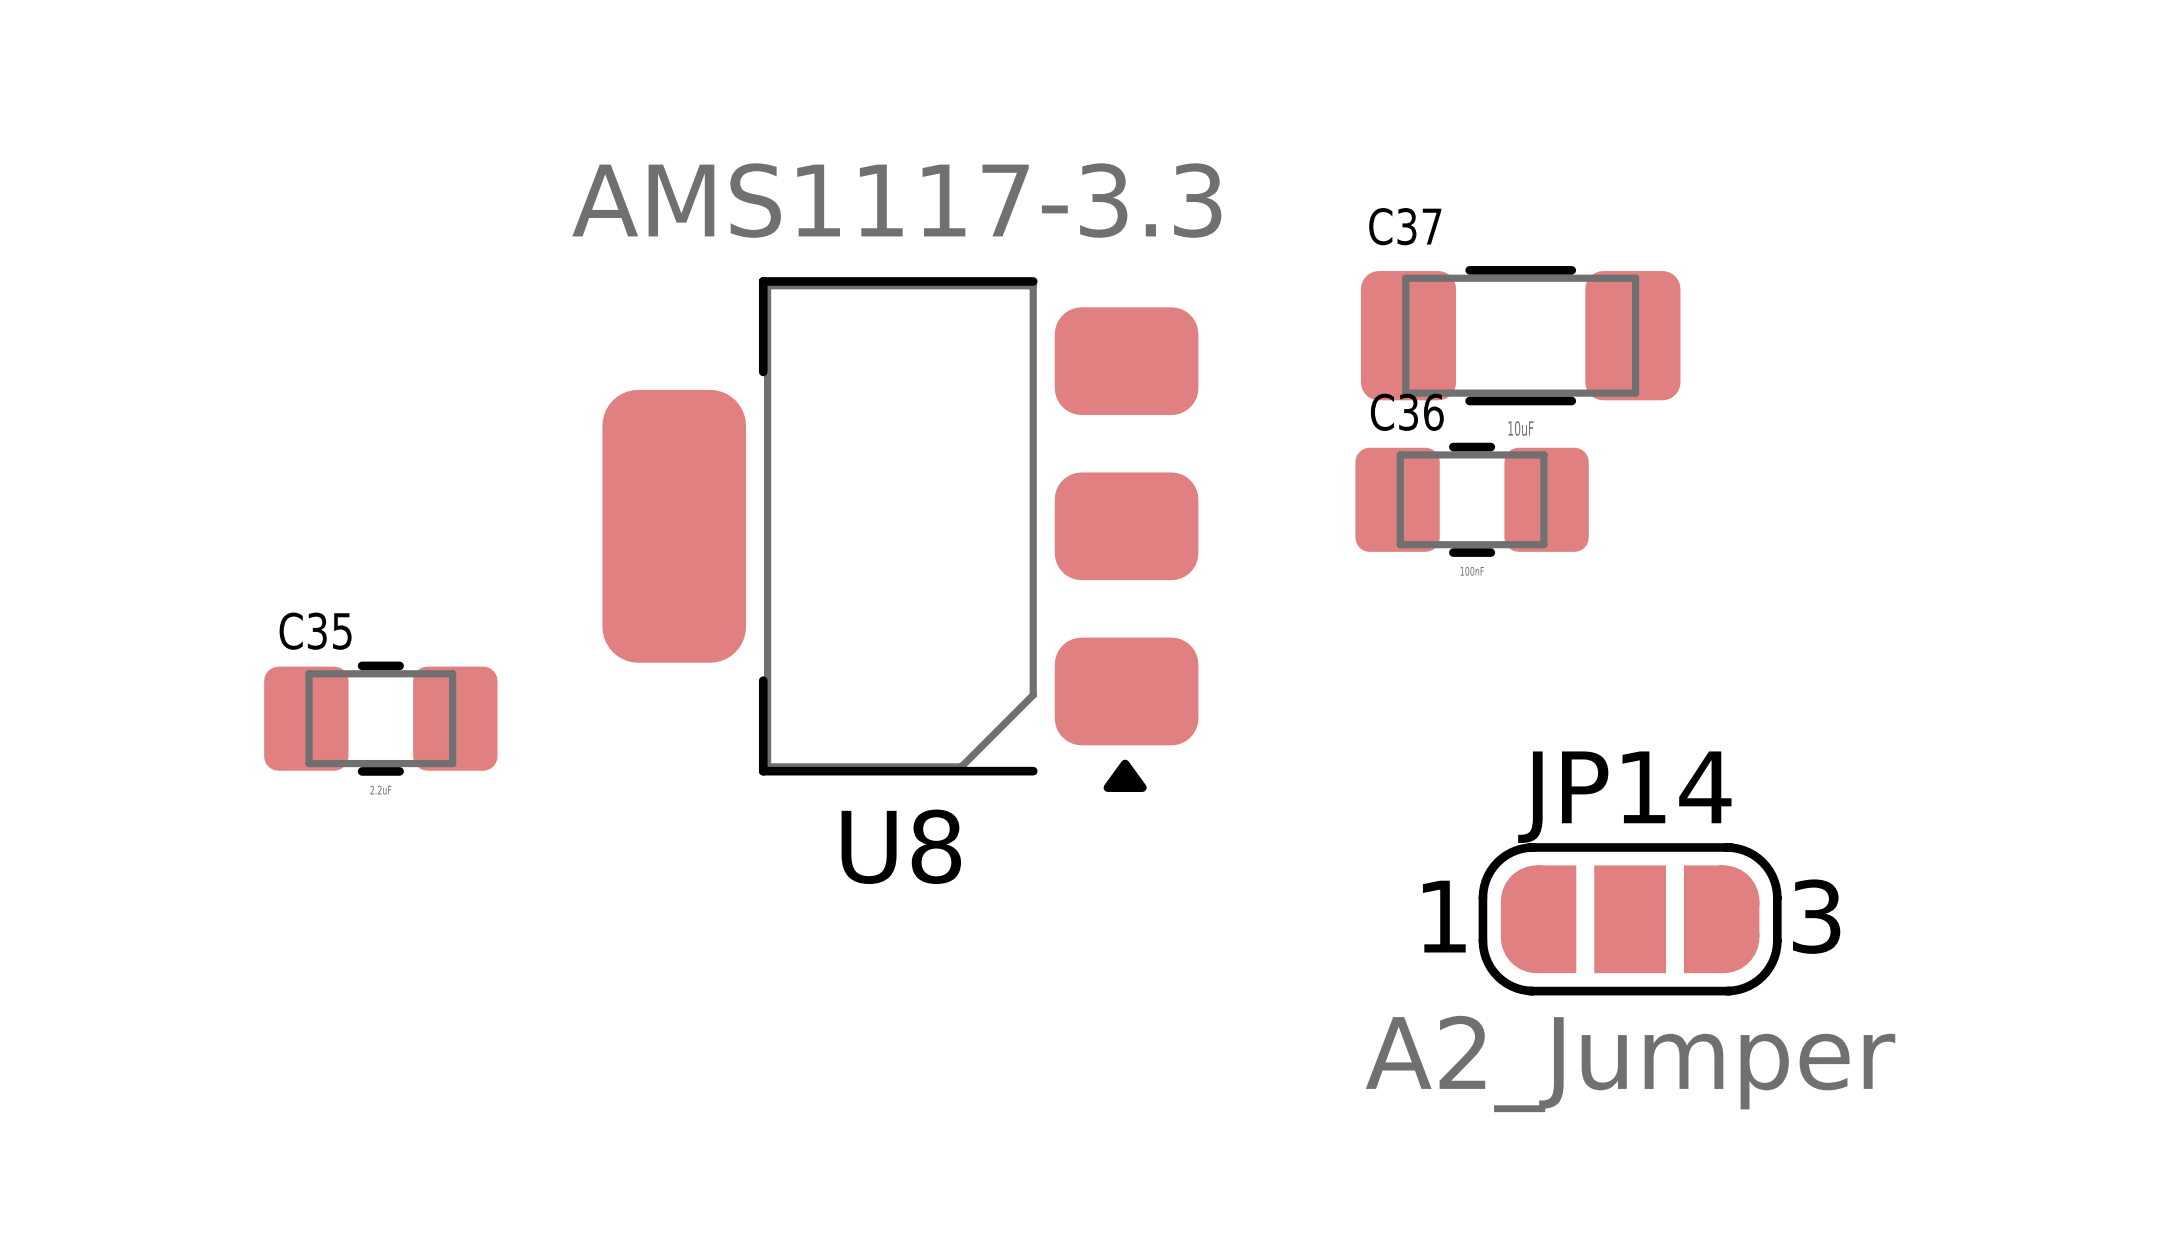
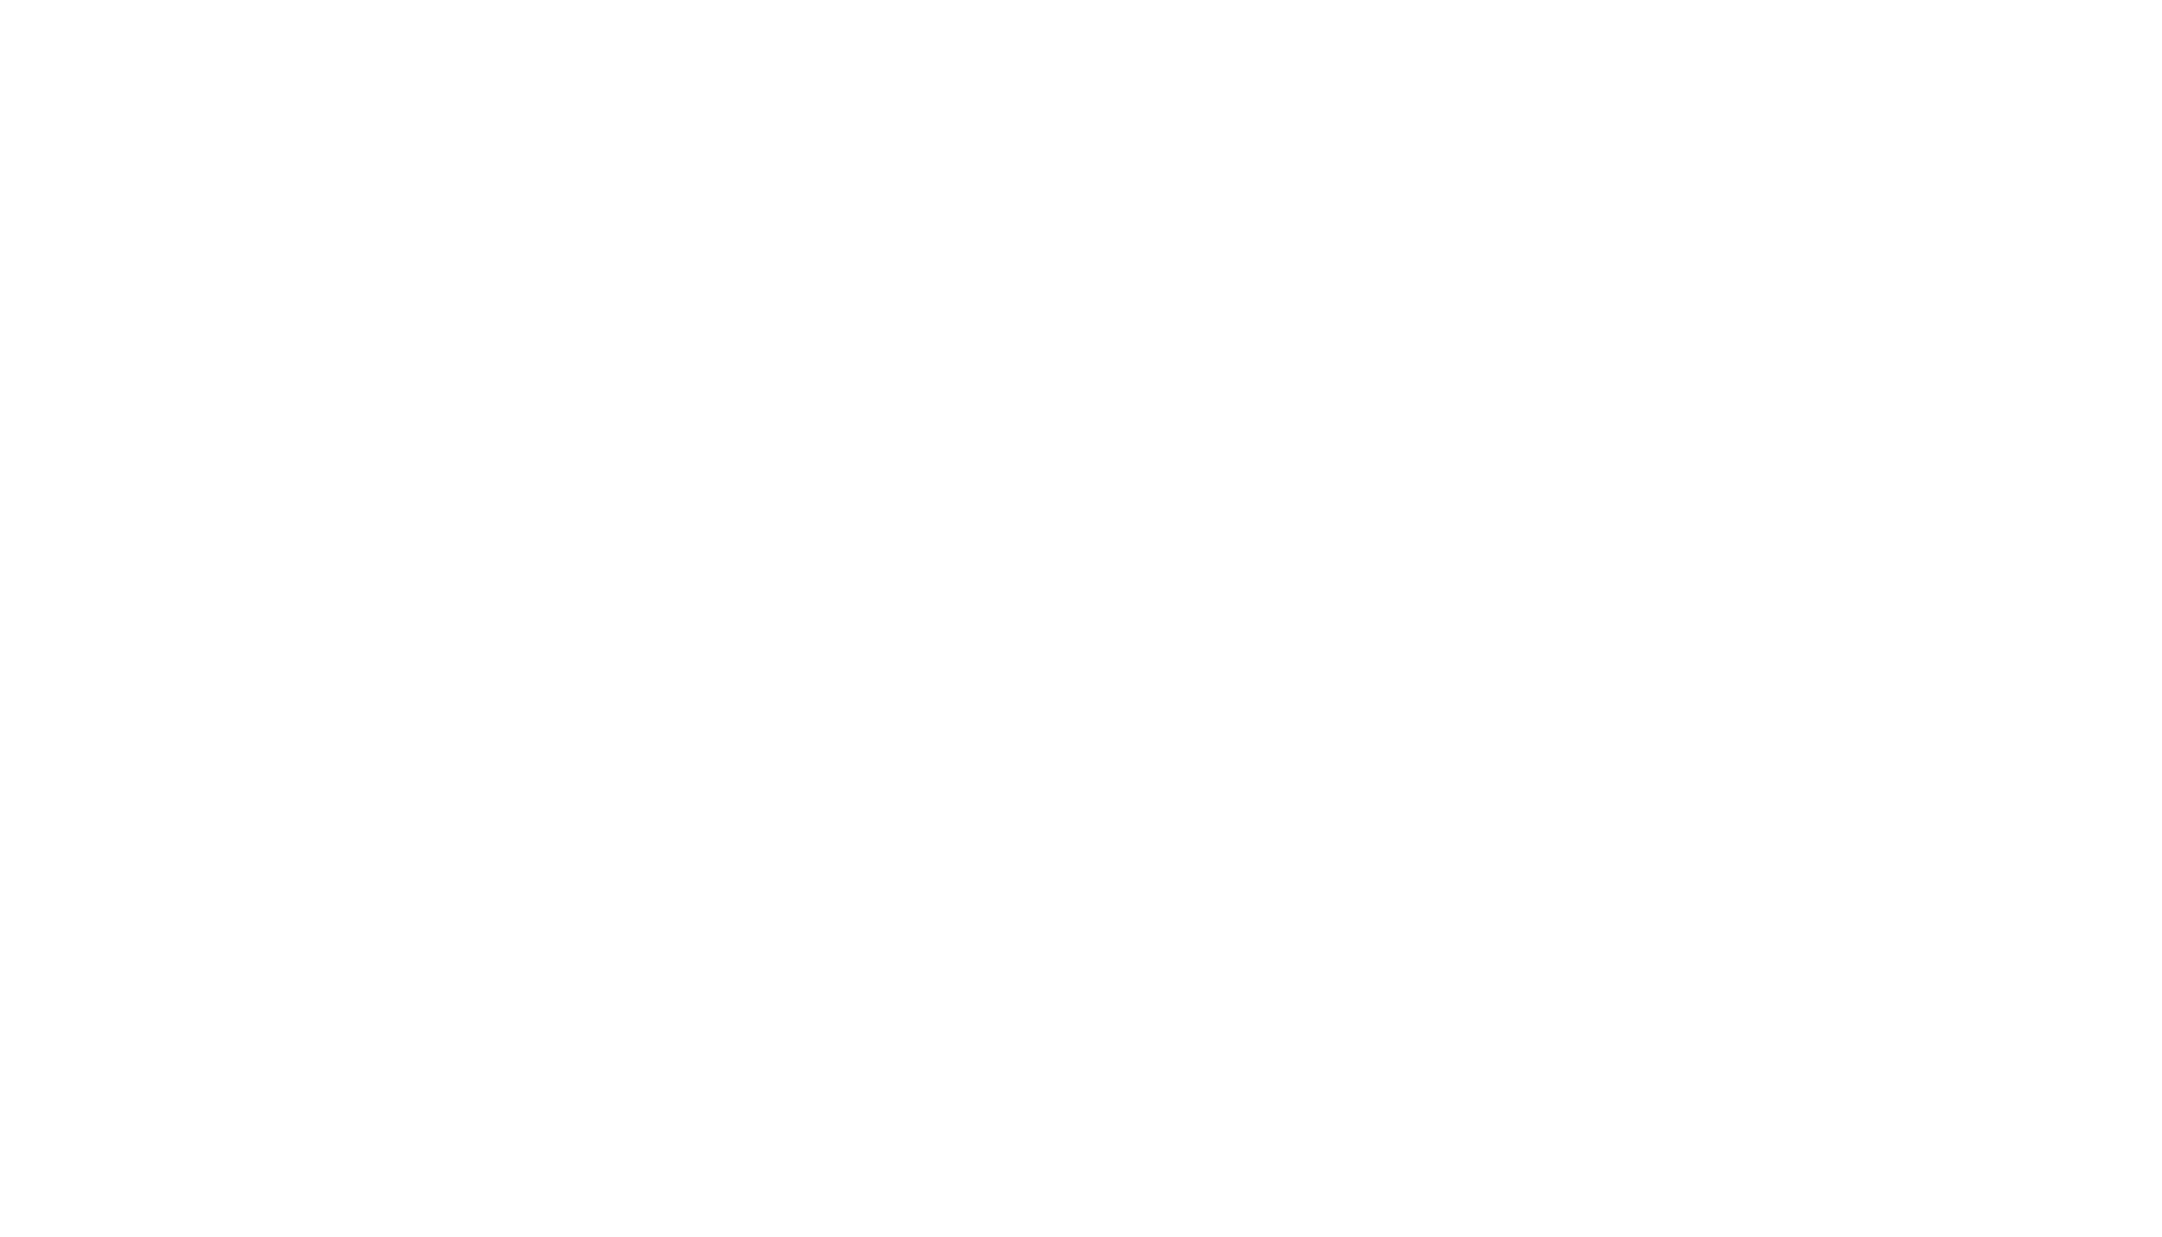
C37: 10uF (1520, 335) -> none
C36: 100nF (1472, 499) -> none
U8: AMS1117-3.3 (900, 534) -> none
C35: 2.2uF (380, 718) -> none
JP14: A2_Jumper (1630, 919) -> none

